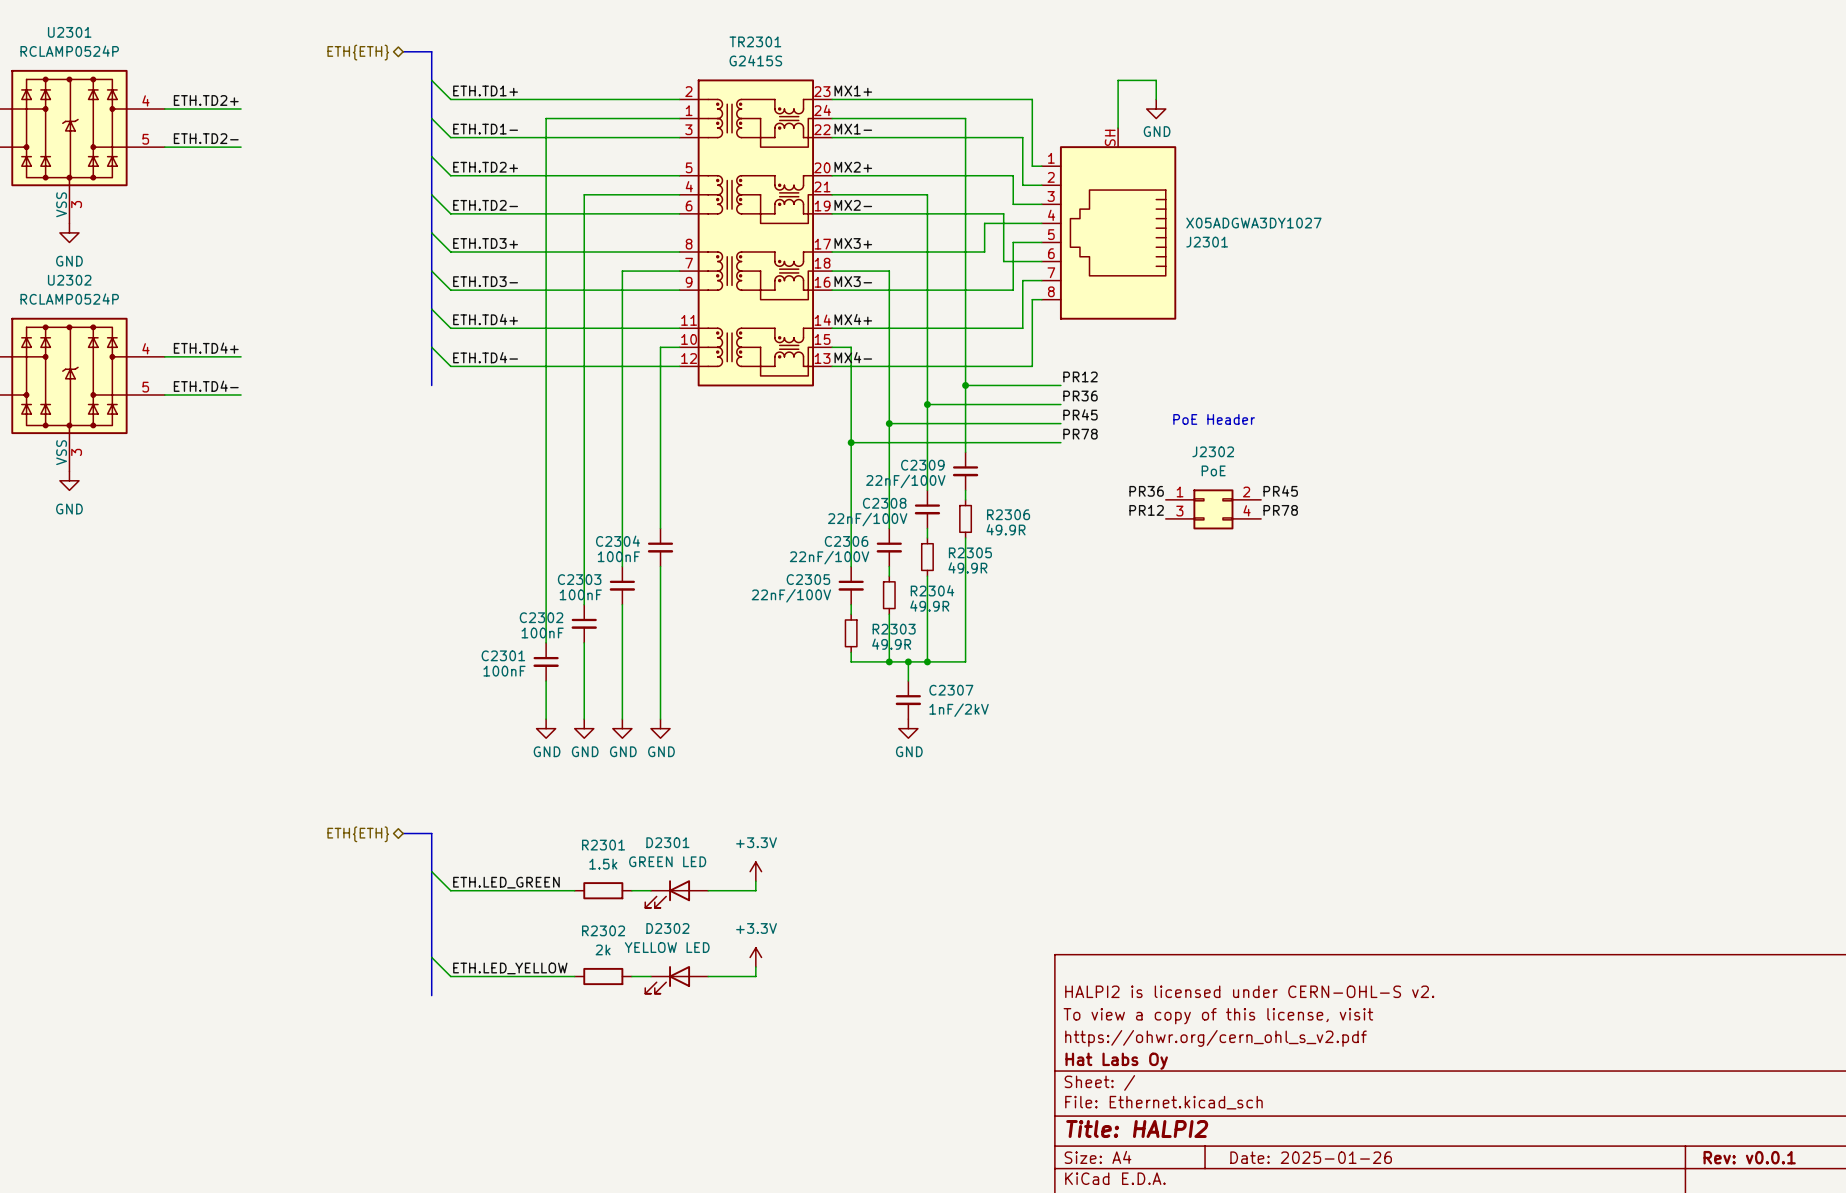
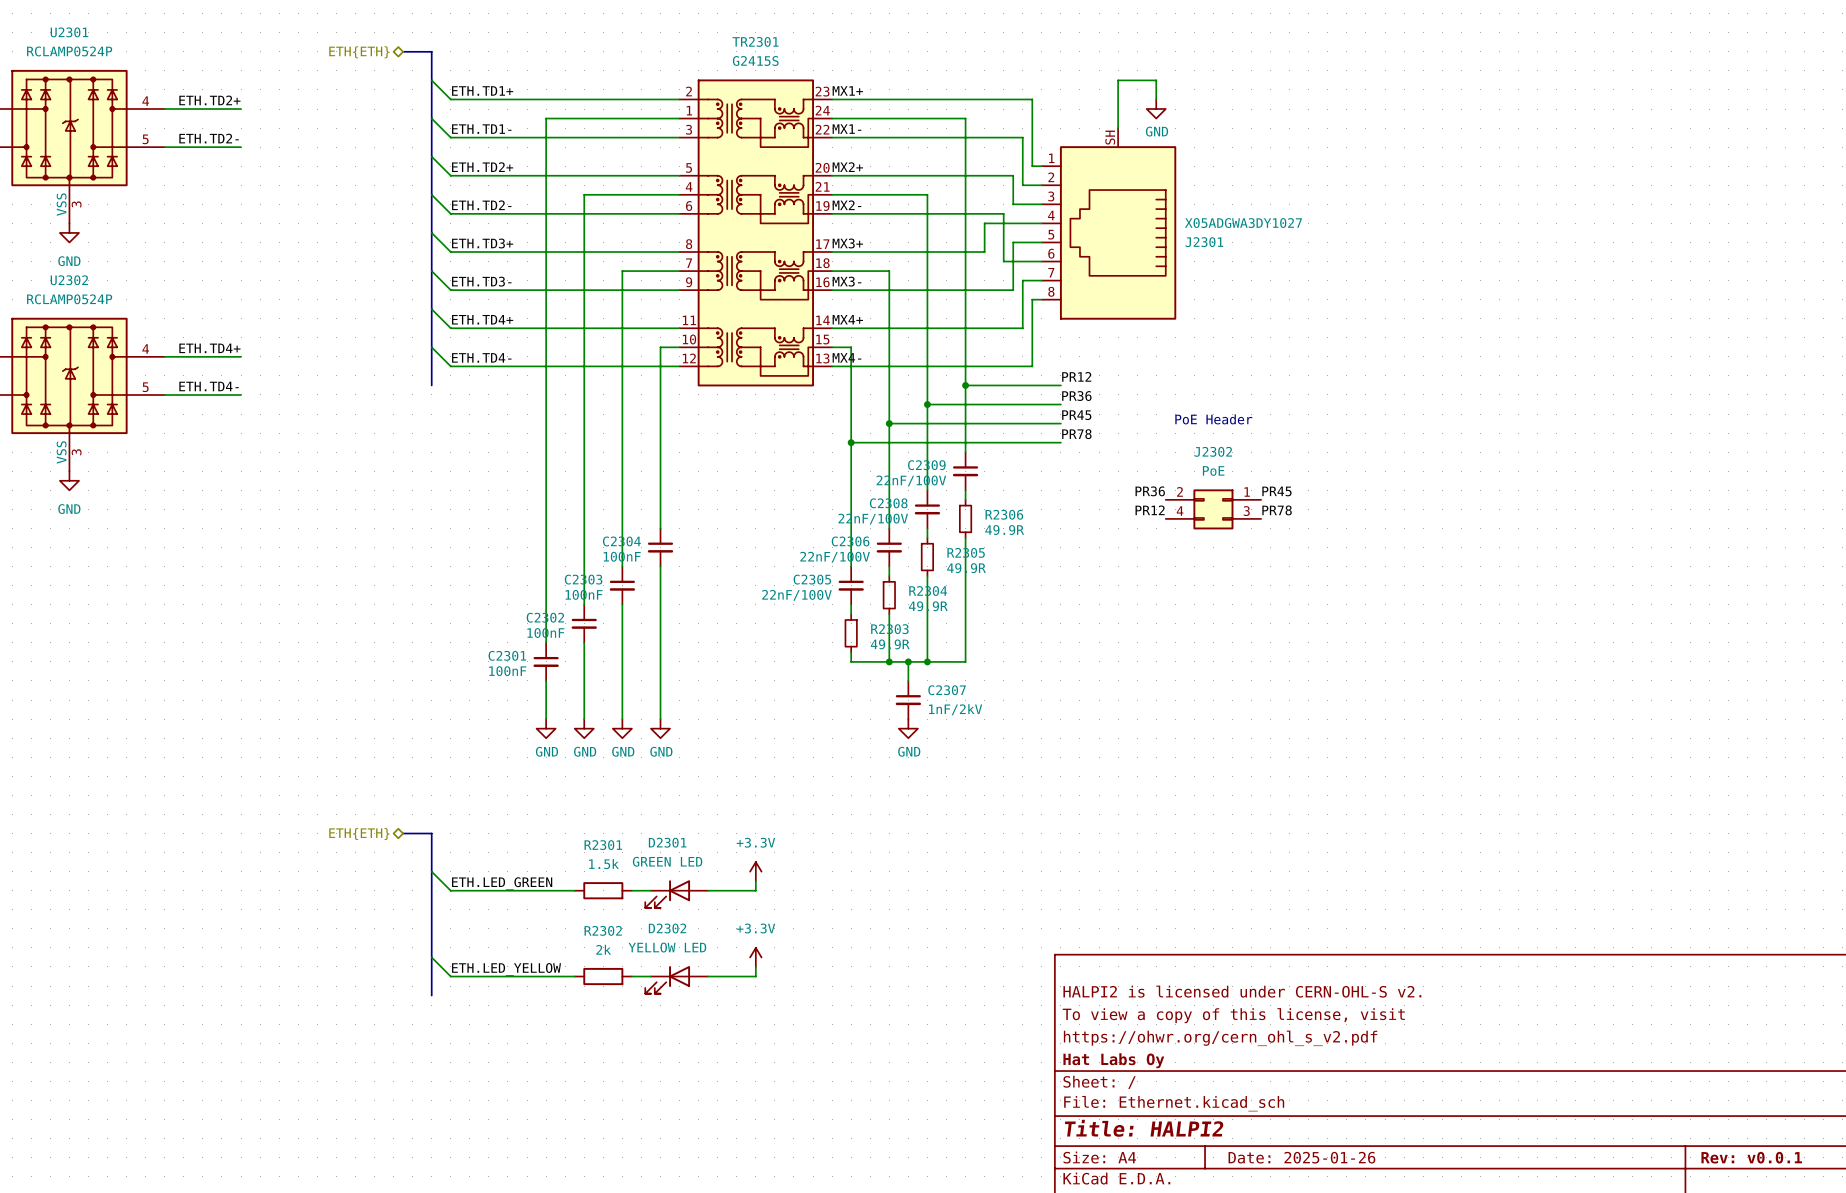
J2302 flip: as is (1213, 509) -> left-right (1213, 509)

